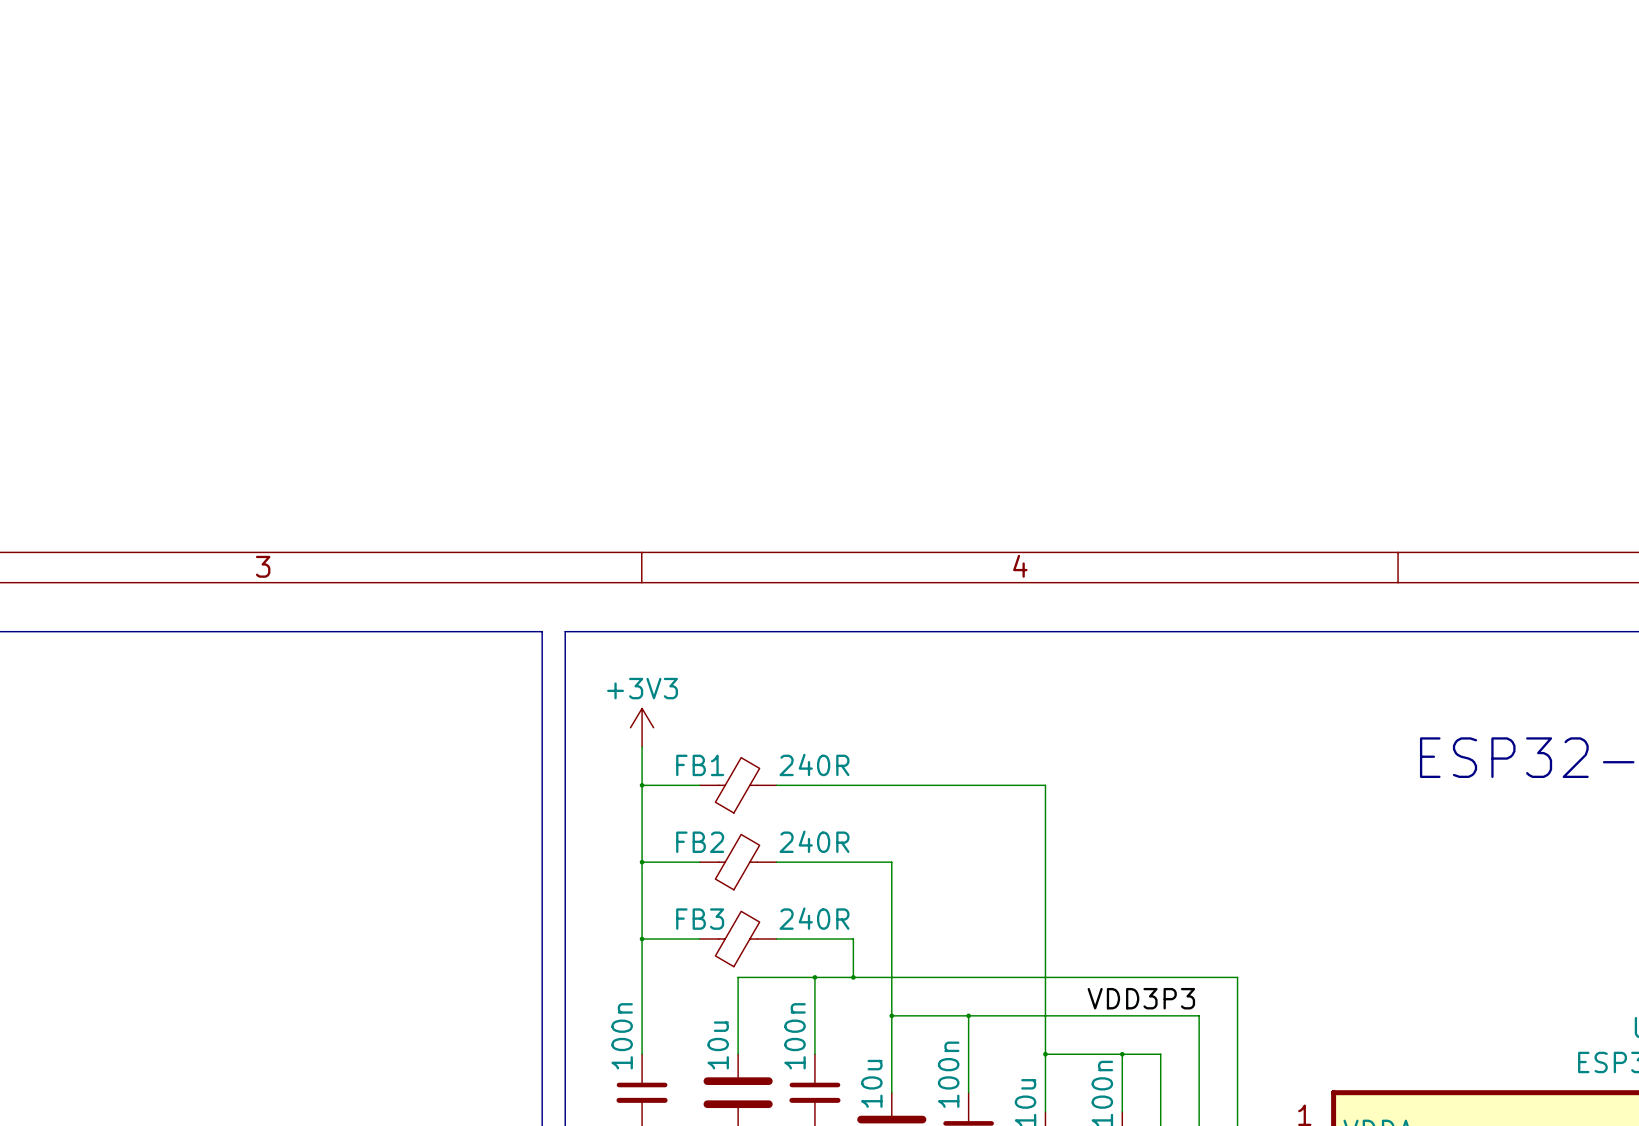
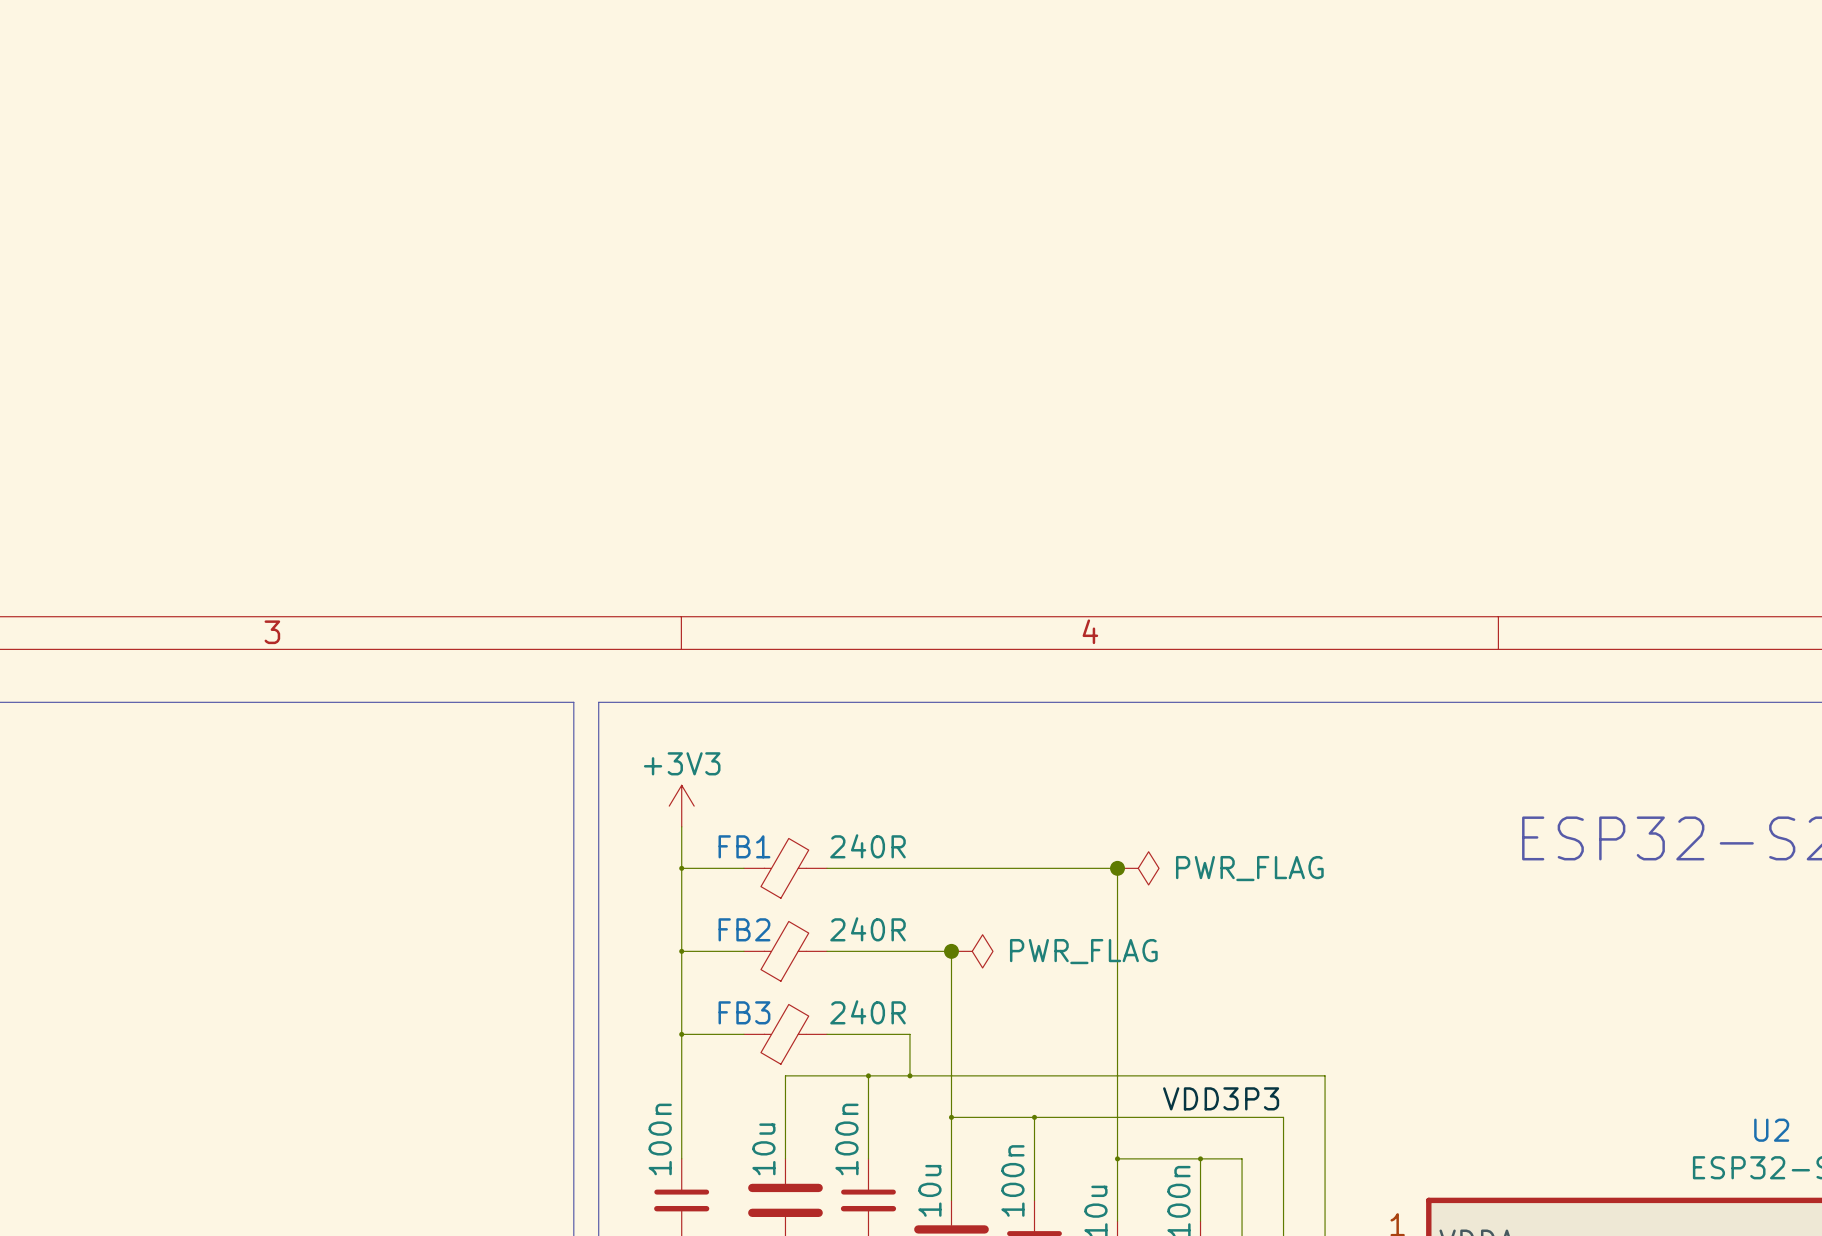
junction: none -> (1117, 868)
power symbol: none -> PWR_FLAG (1138, 868)
junction: none -> (951, 951)
power symbol: none -> PWR_FLAG (972, 951)

